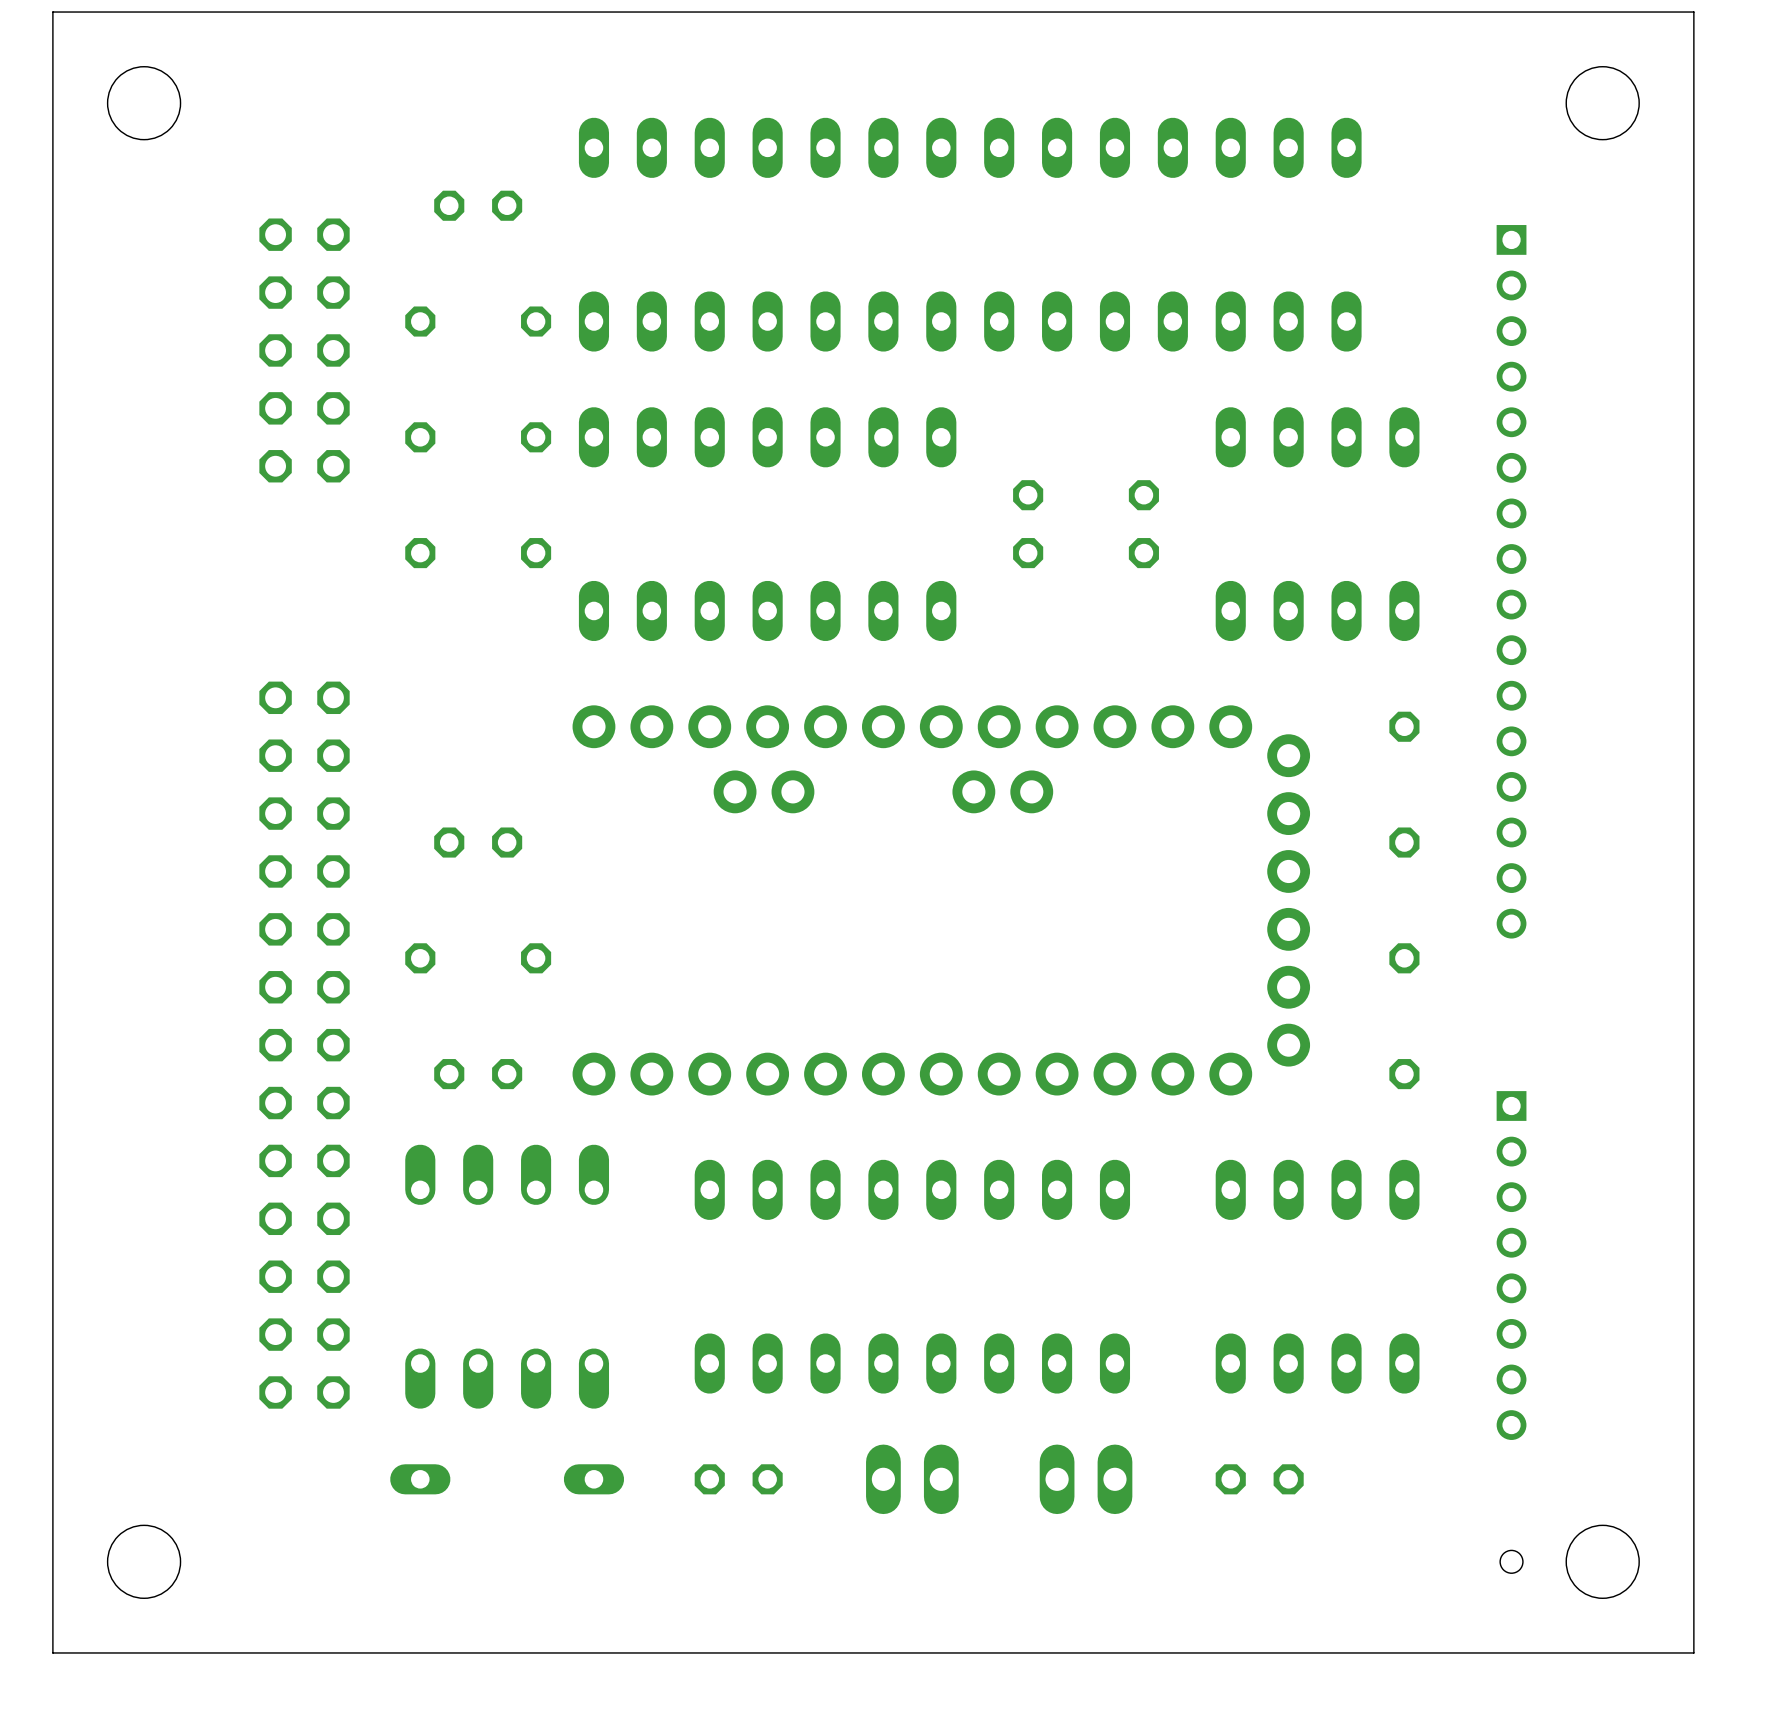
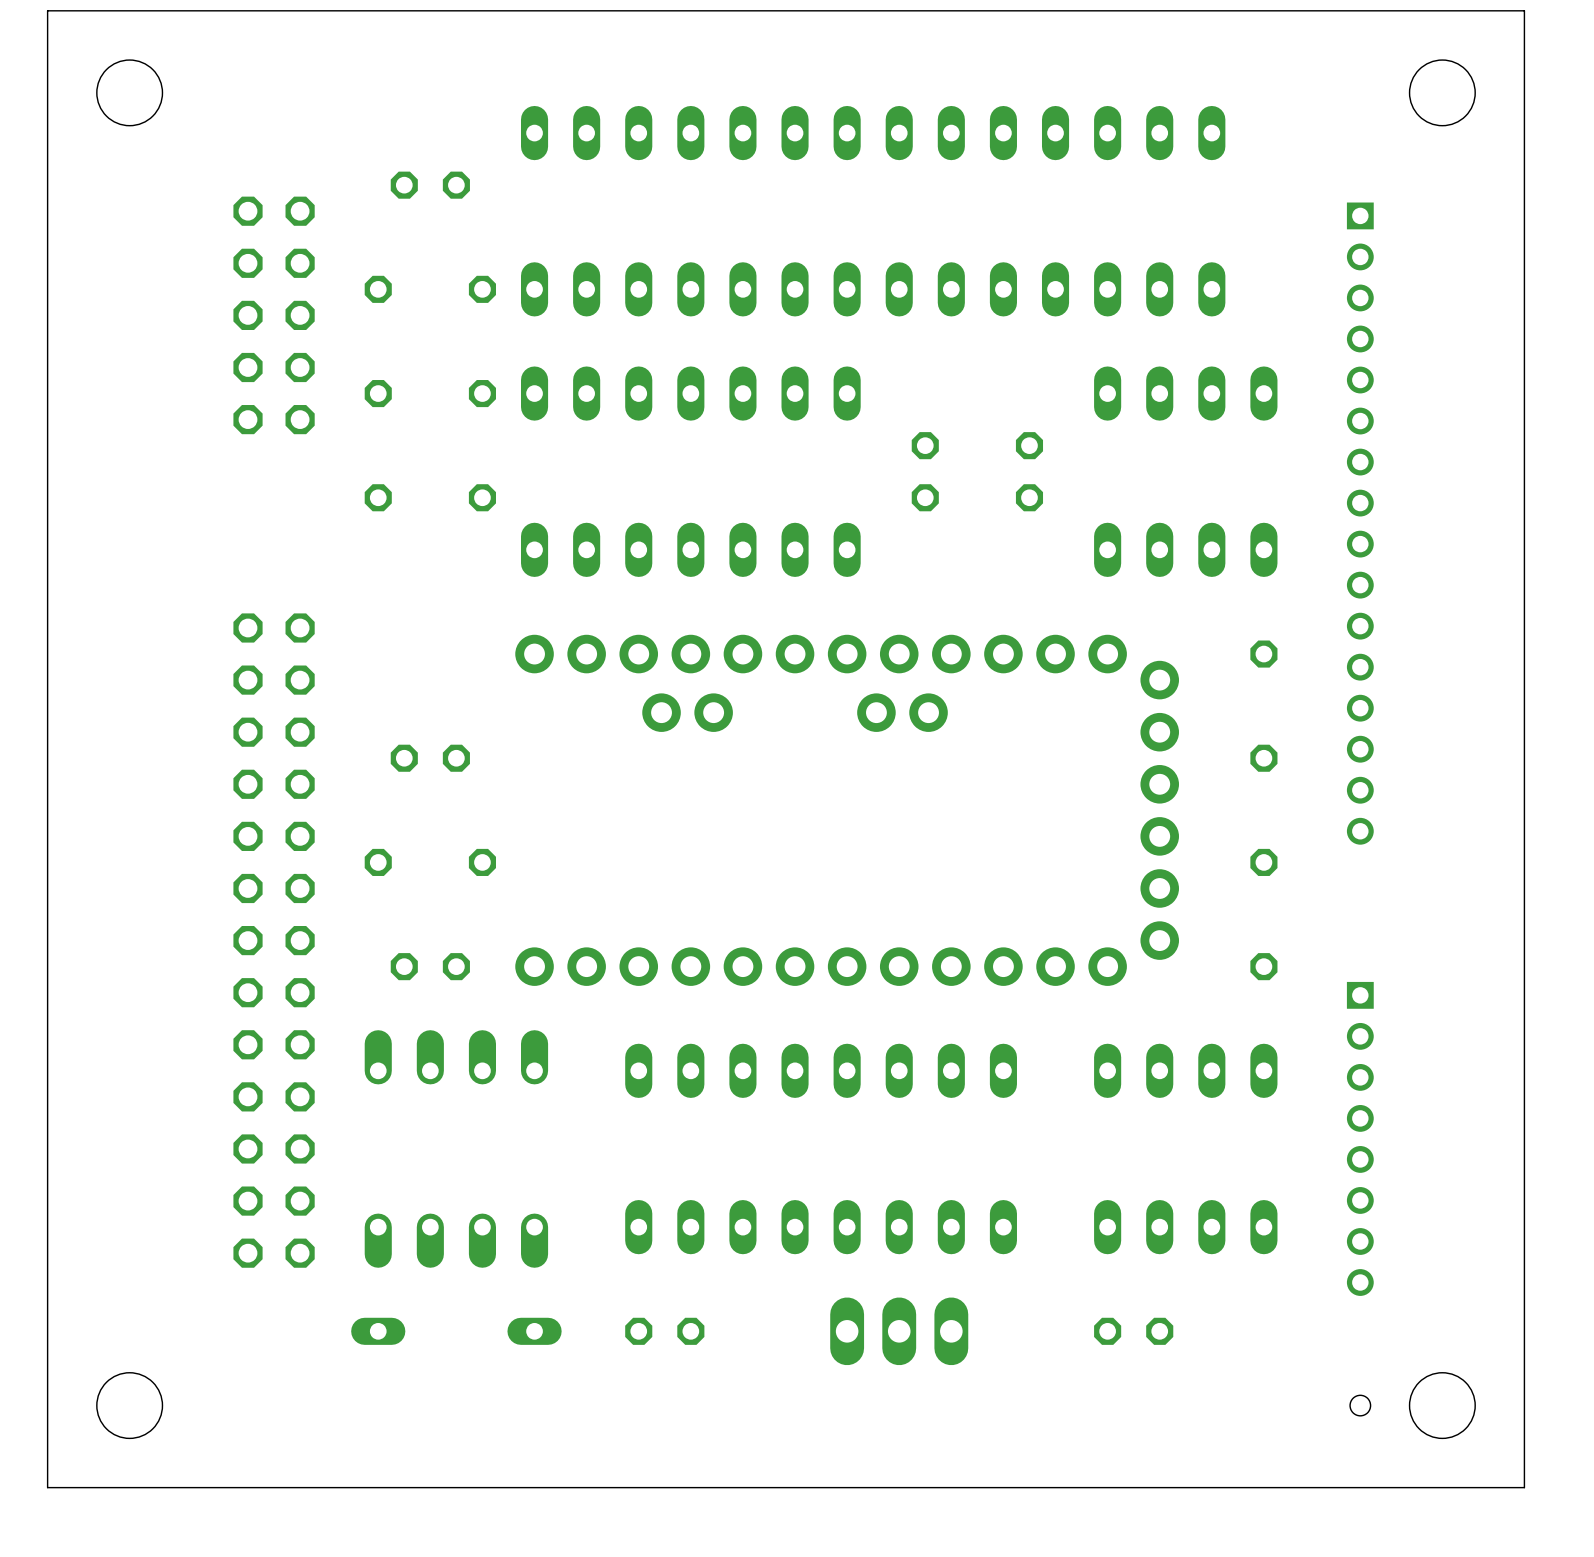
part: (912, 1479) -> none
part: none -> (899, 1331)
part: (1086, 1479) -> none

